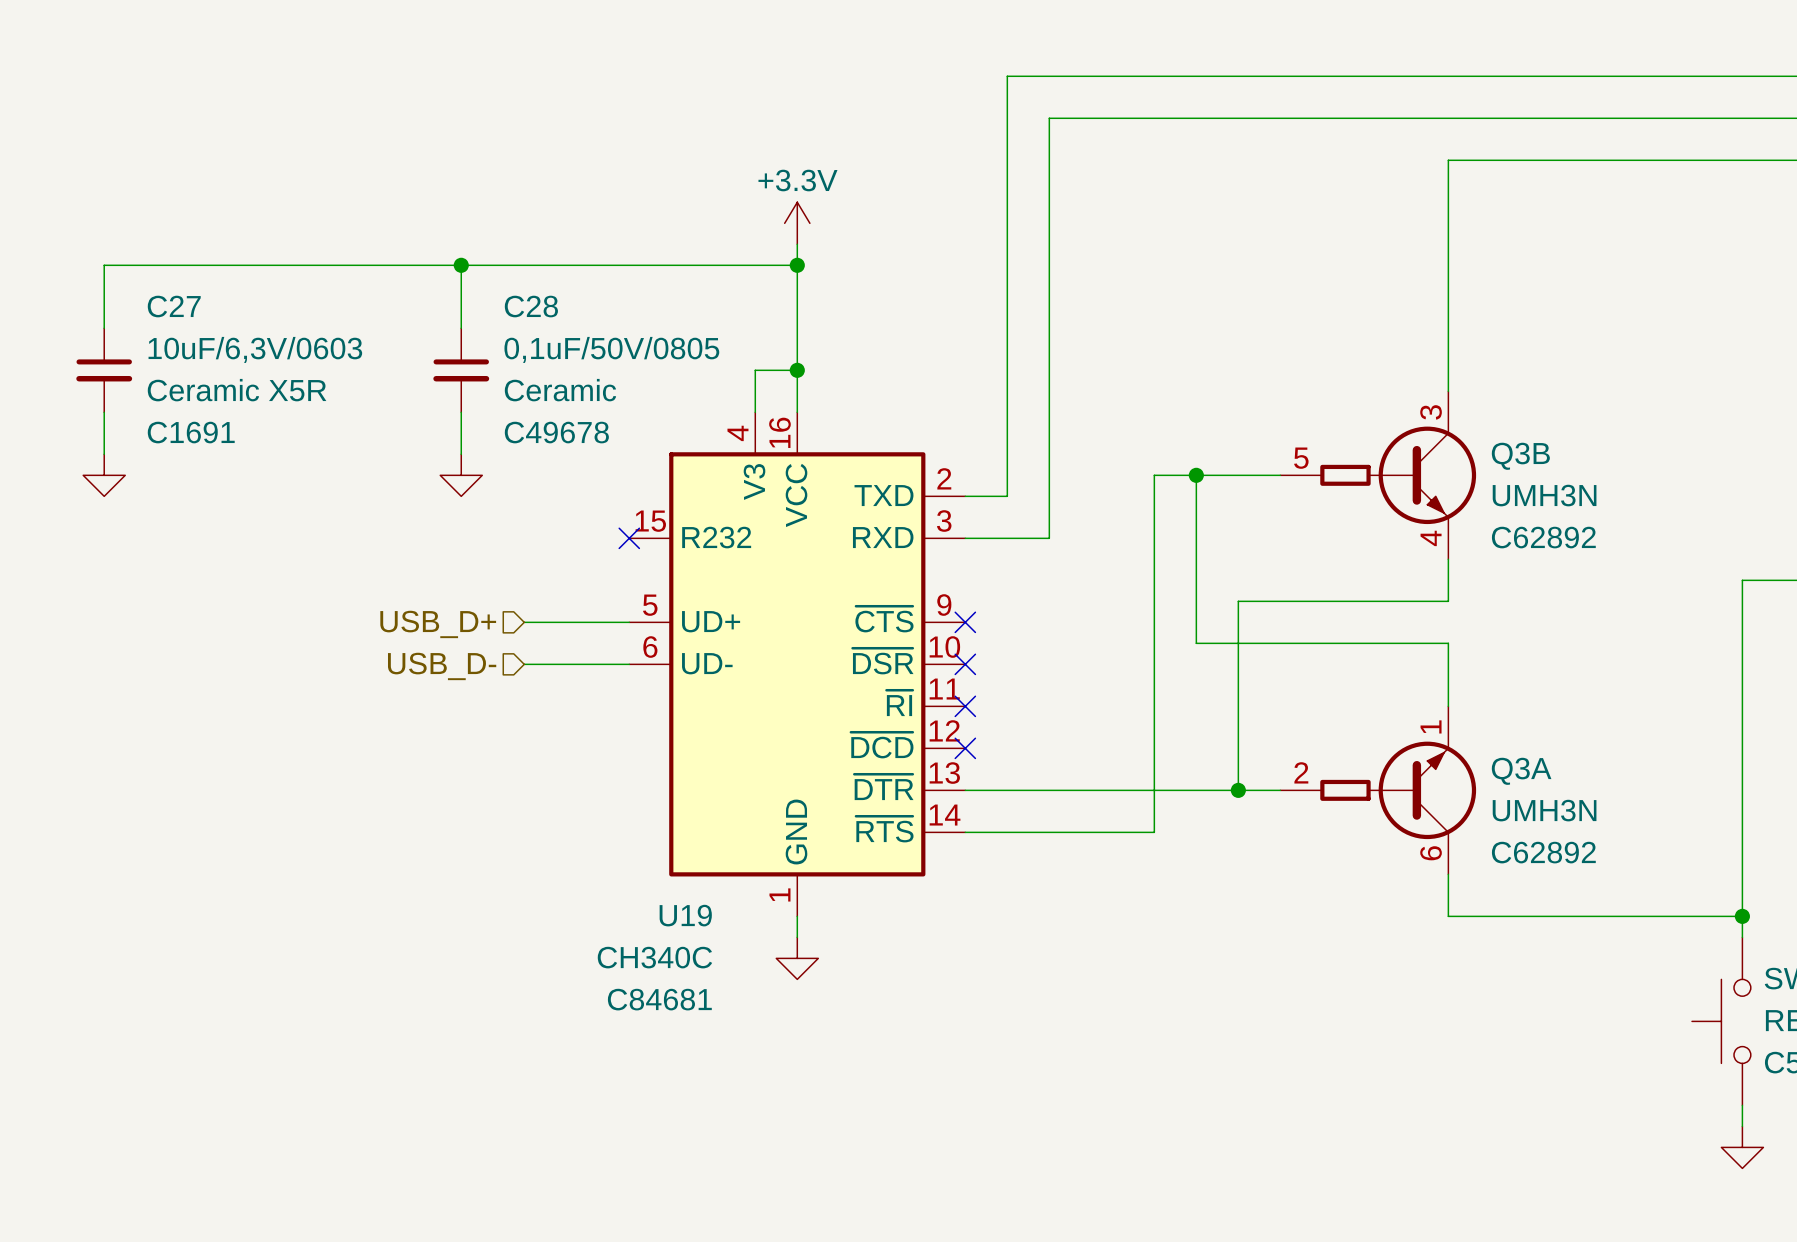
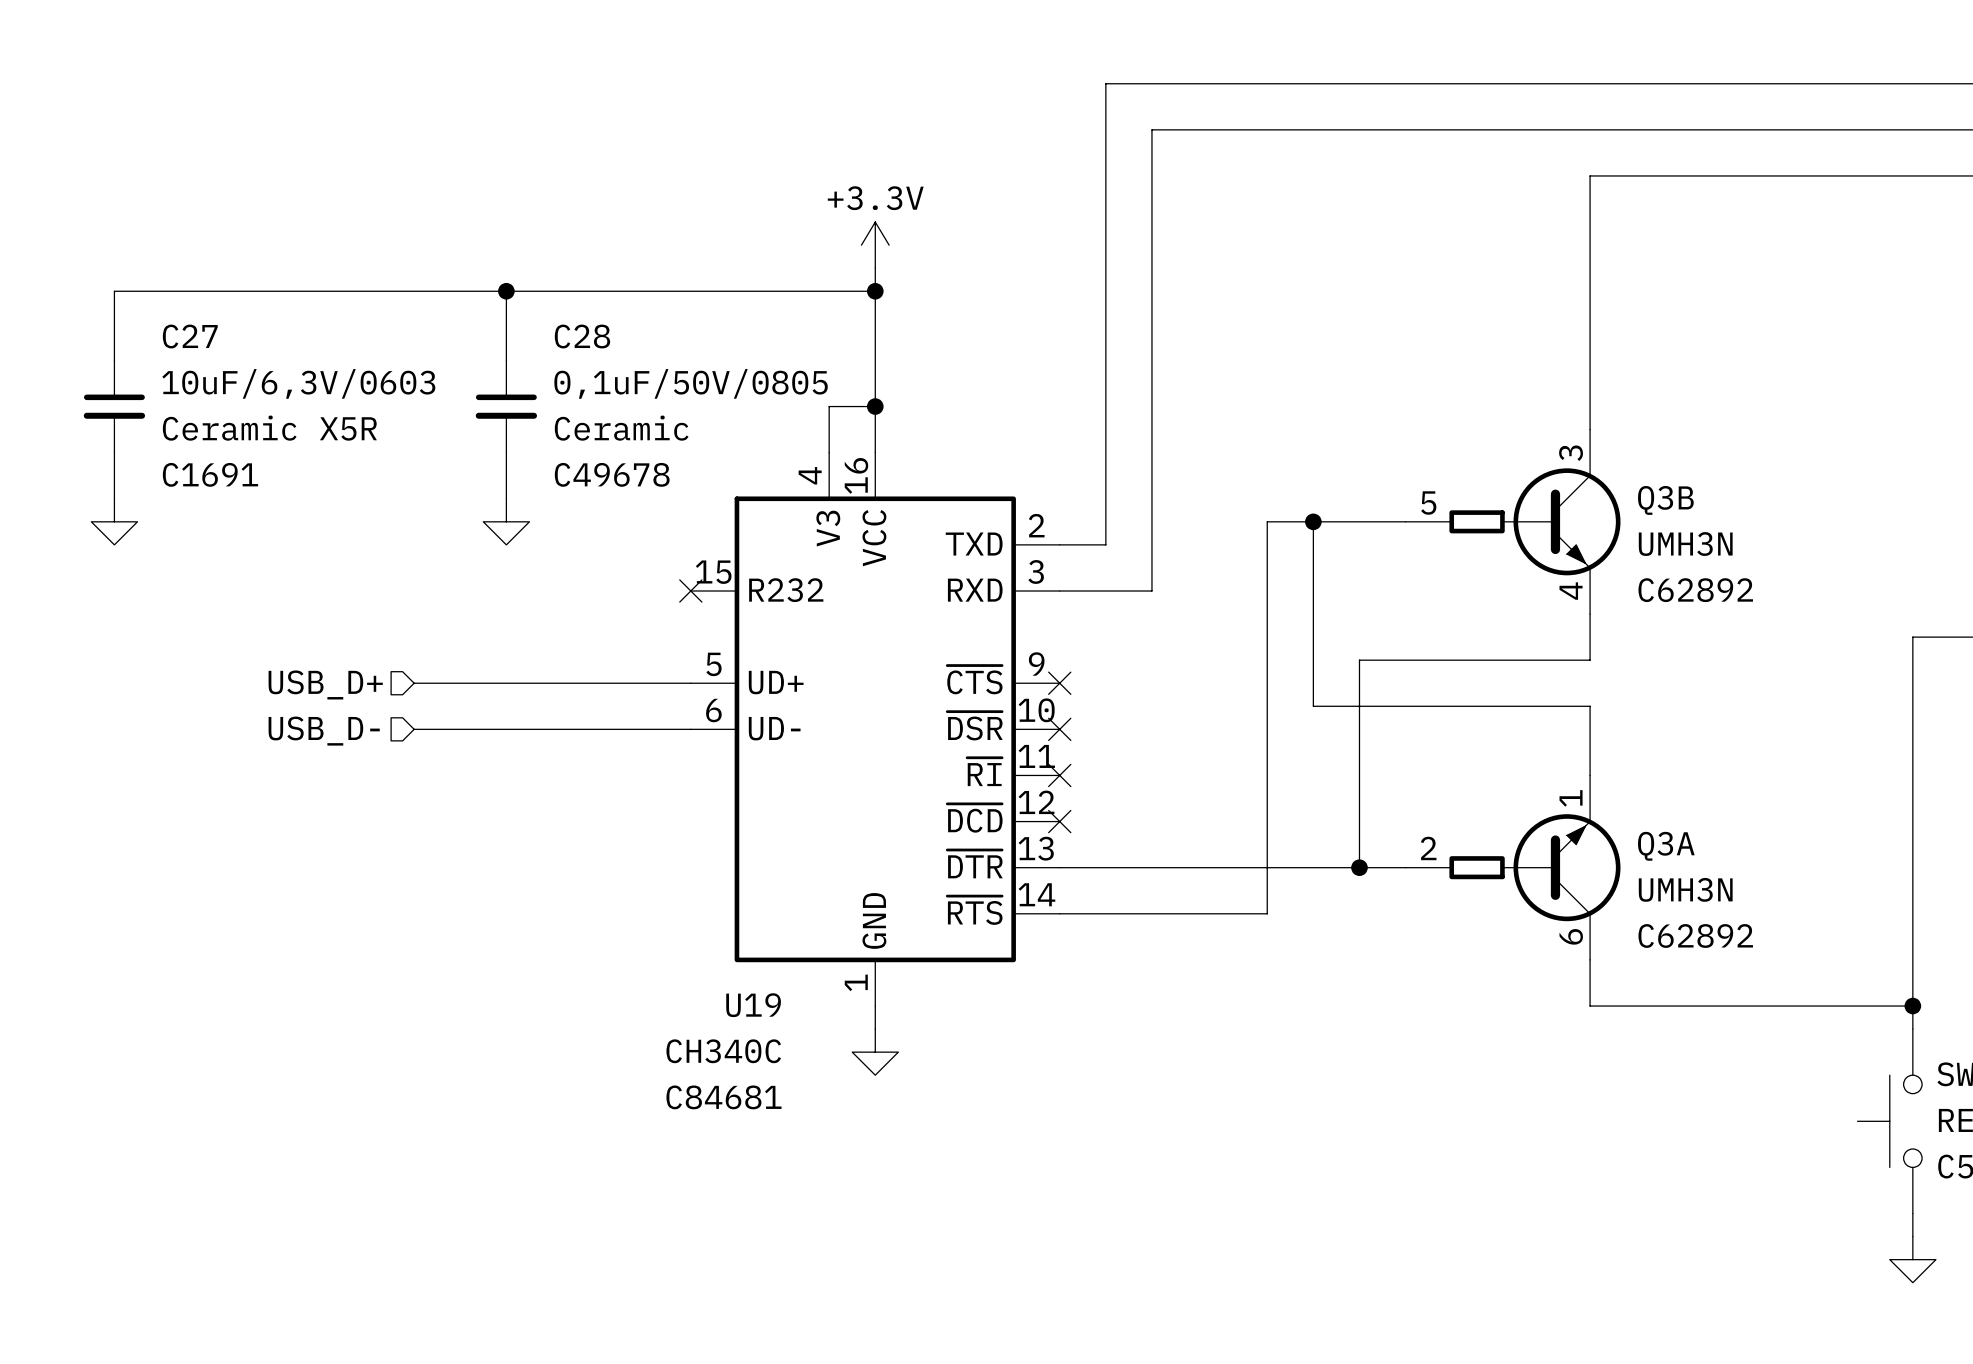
wire: none -> (414, 683) (575, 683)
hierarchical label position: USB_D+ (438, 624) -> USB_D+ (325, 684)
wire: none -> (414, 729) (575, 729)
hierarchical label position: USB_D- (442, 666) -> USB_D- (324, 731)

